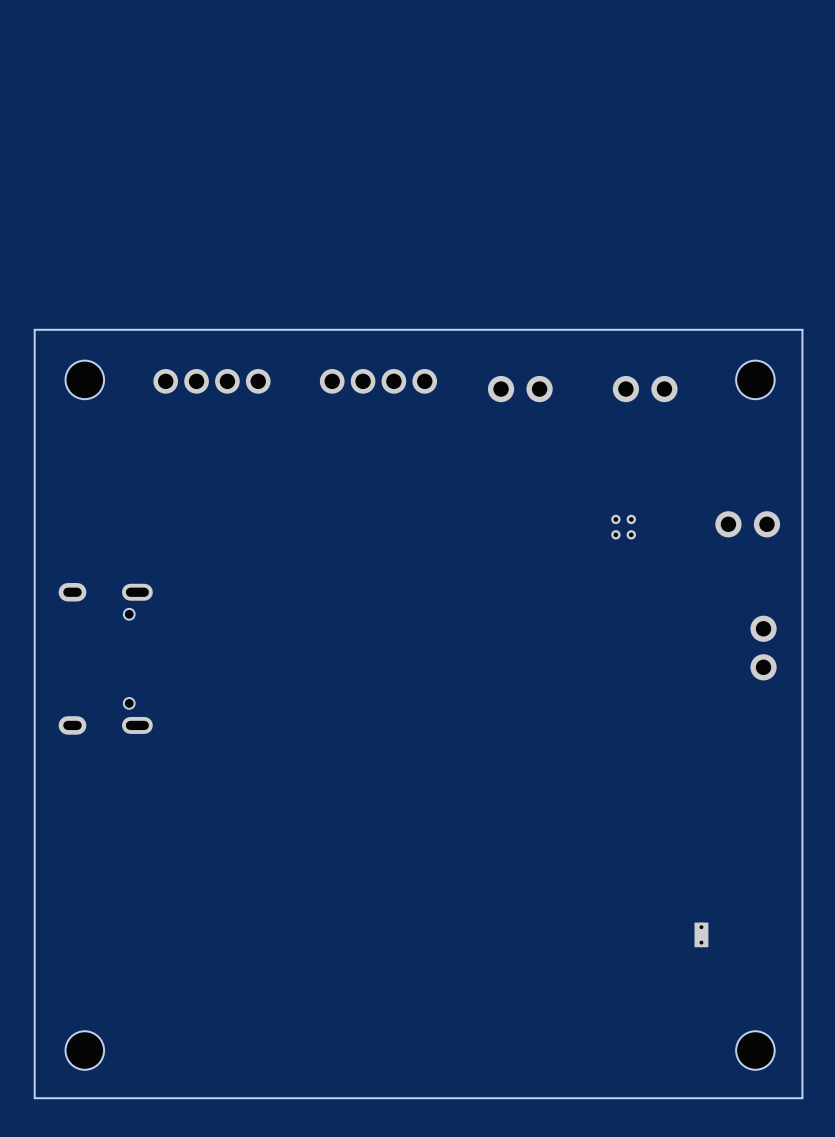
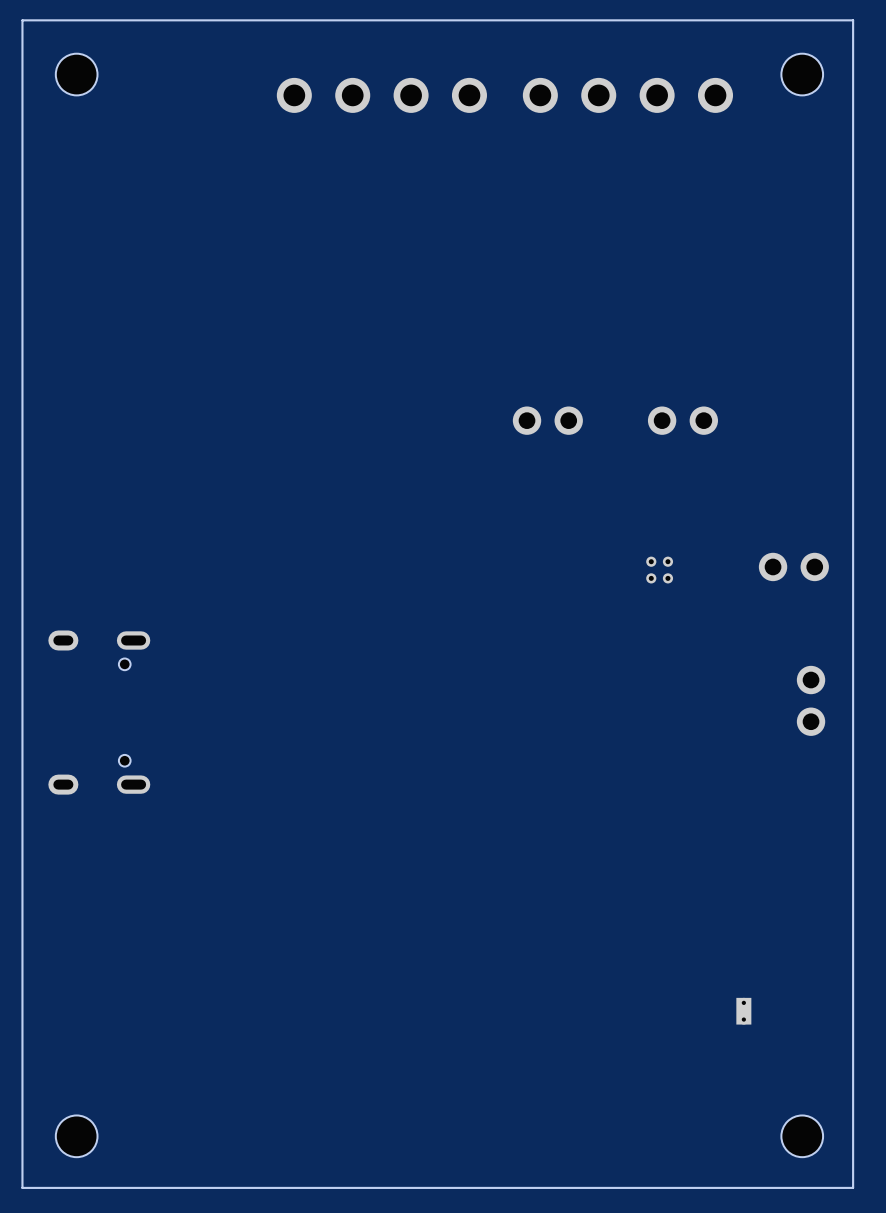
part: none -> (381, 95)
part: none -> (627, 95)
board edge: (802, 329) (34, 329) -> (853, 356) (853, 20) (22, 20) (22, 356)
part position: (84, 379) -> (76, 74)
part position: (755, 379) -> (802, 74)
part: (211, 381) -> none
part: (378, 381) -> none

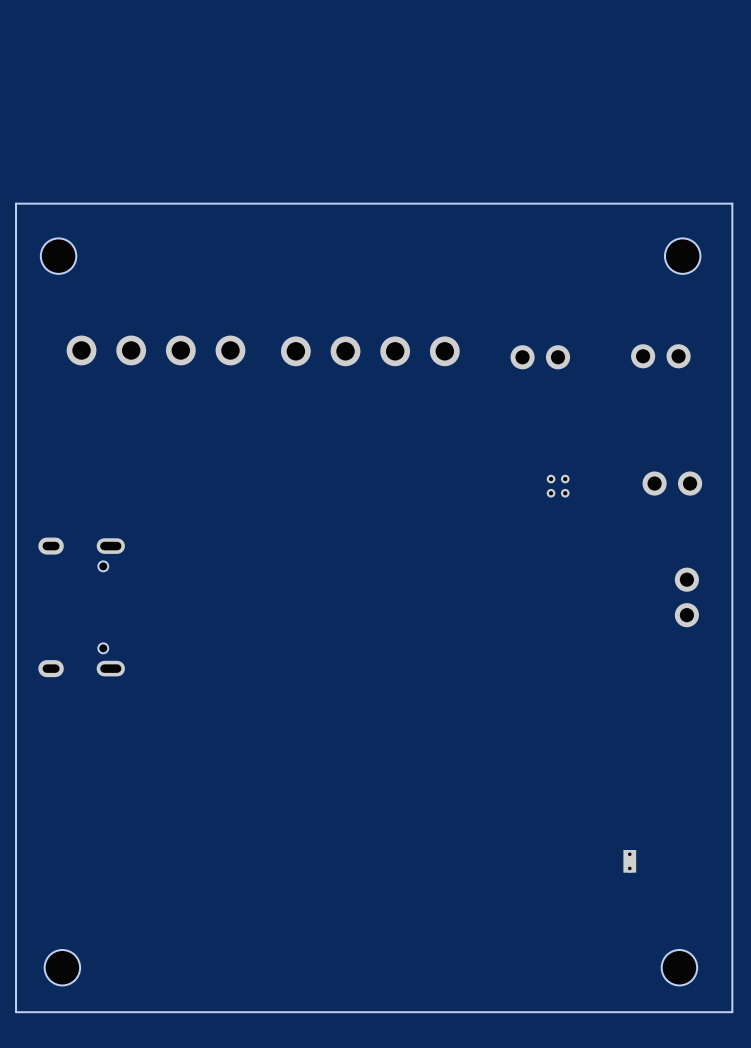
board edge: (853, 20) (22, 20) (22, 1187) (853, 1187) (853, 20) -> (732, 203) (732, 1012) (16, 1012) (16, 203) (732, 203)
part position: (76, 74) -> (58, 256)
part position: (802, 74) -> (682, 256)
part: (381, 95) -> none
part: (627, 95) -> none
part: none -> (156, 350)
part: none -> (370, 351)
part: none -> (660, 356)
part: (547, 420) -> none
part position: (682, 420) -> (540, 357)

